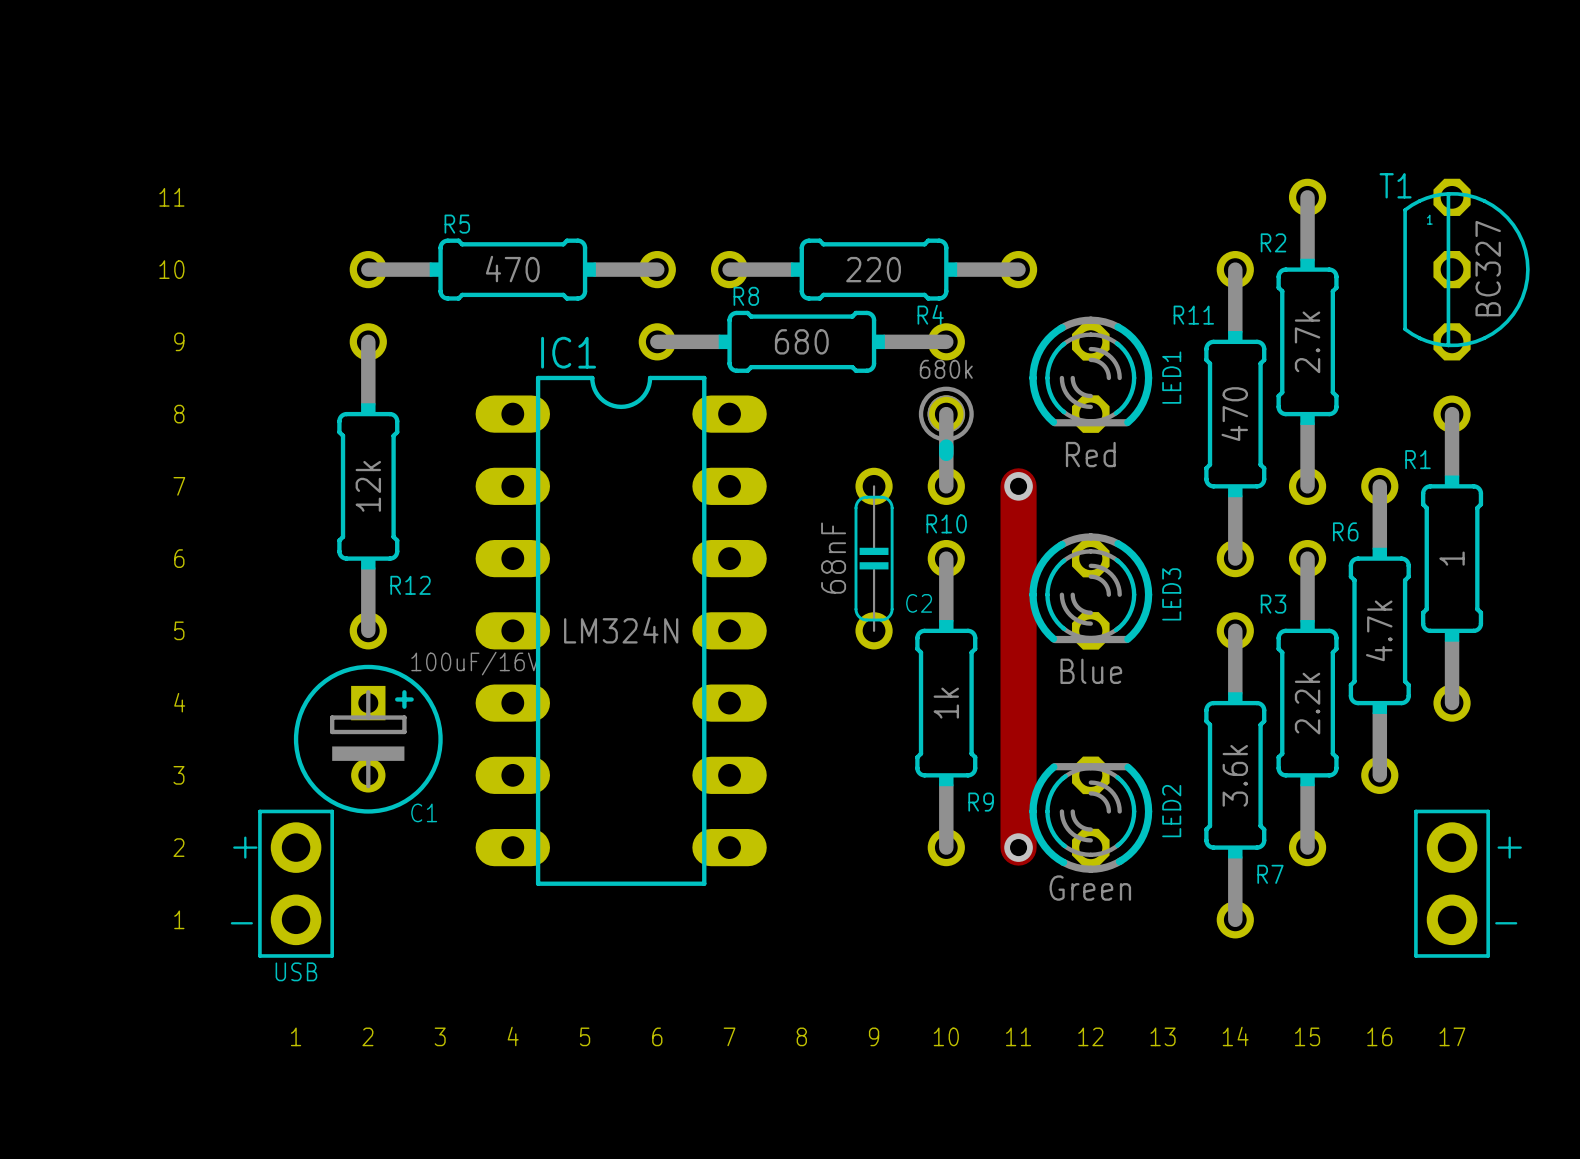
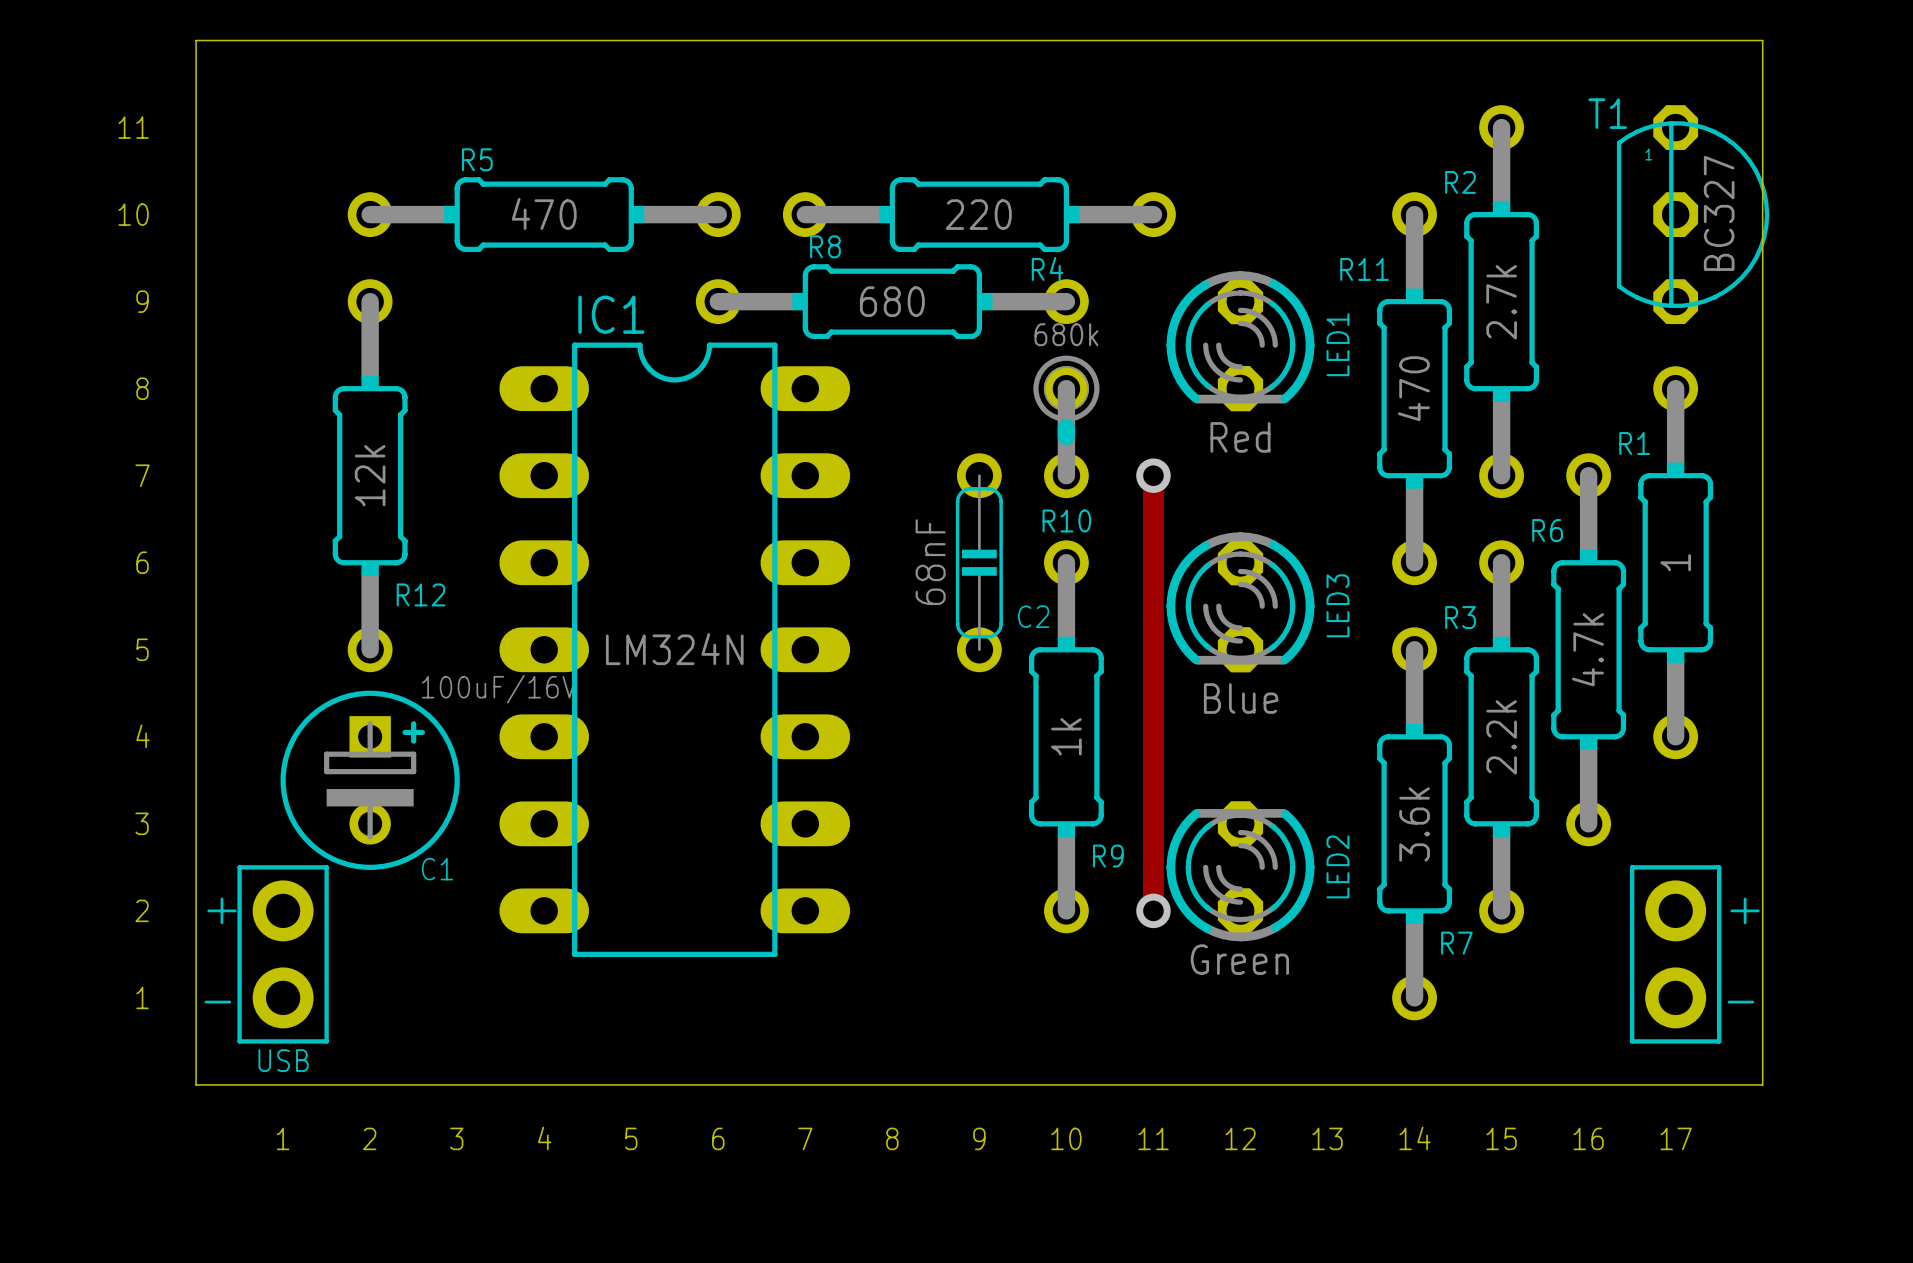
board edge: none -> (196, 40) (1762, 40) (1762, 1084) (196, 1084) (196, 40)
track width: thick (1018, 486) (1018, 847) -> thin (1153, 475) (1153, 910)

